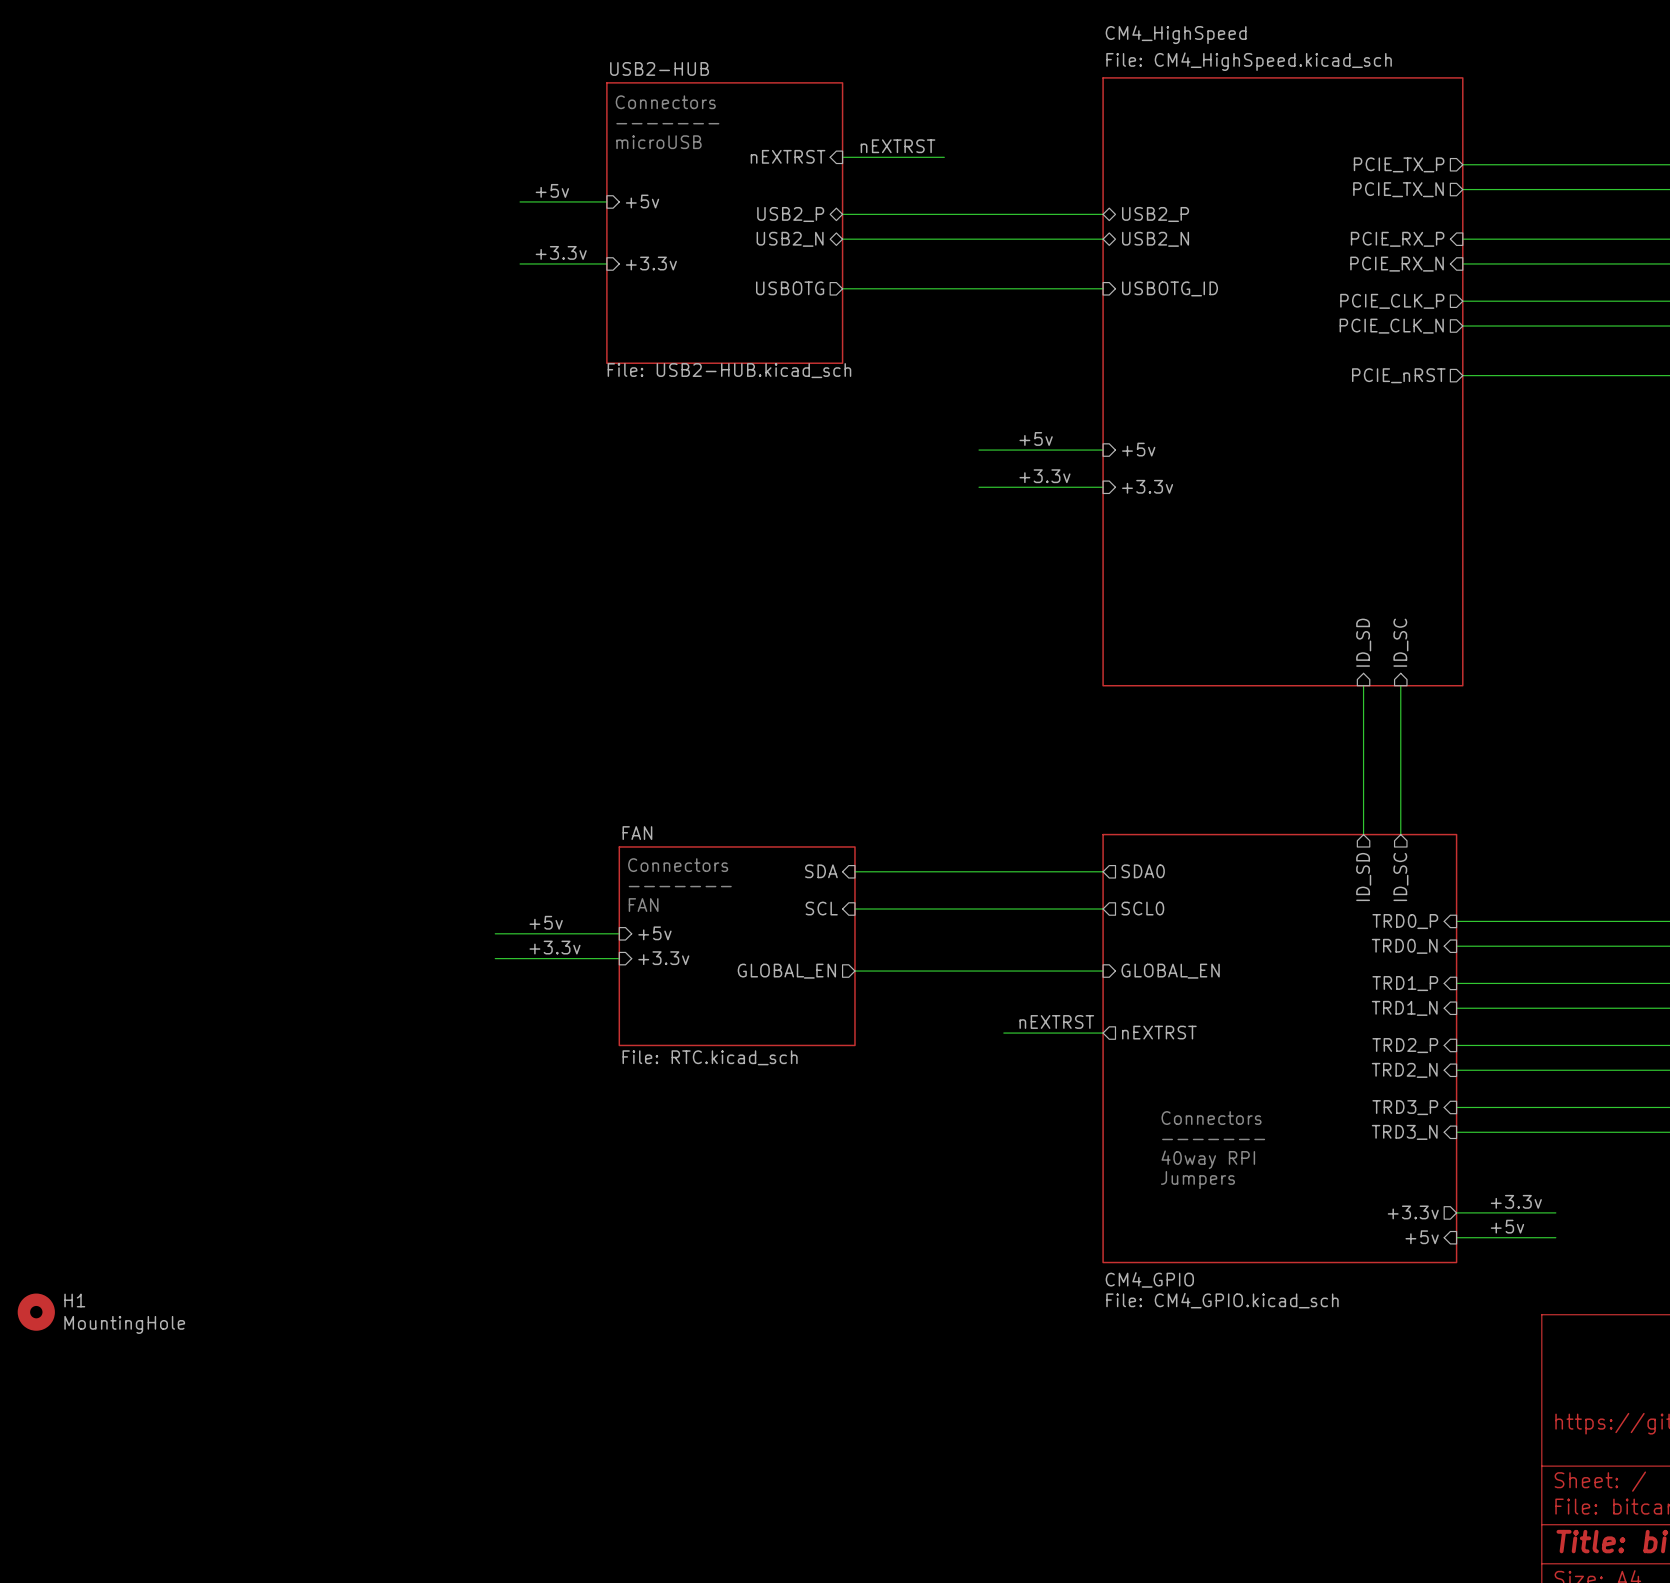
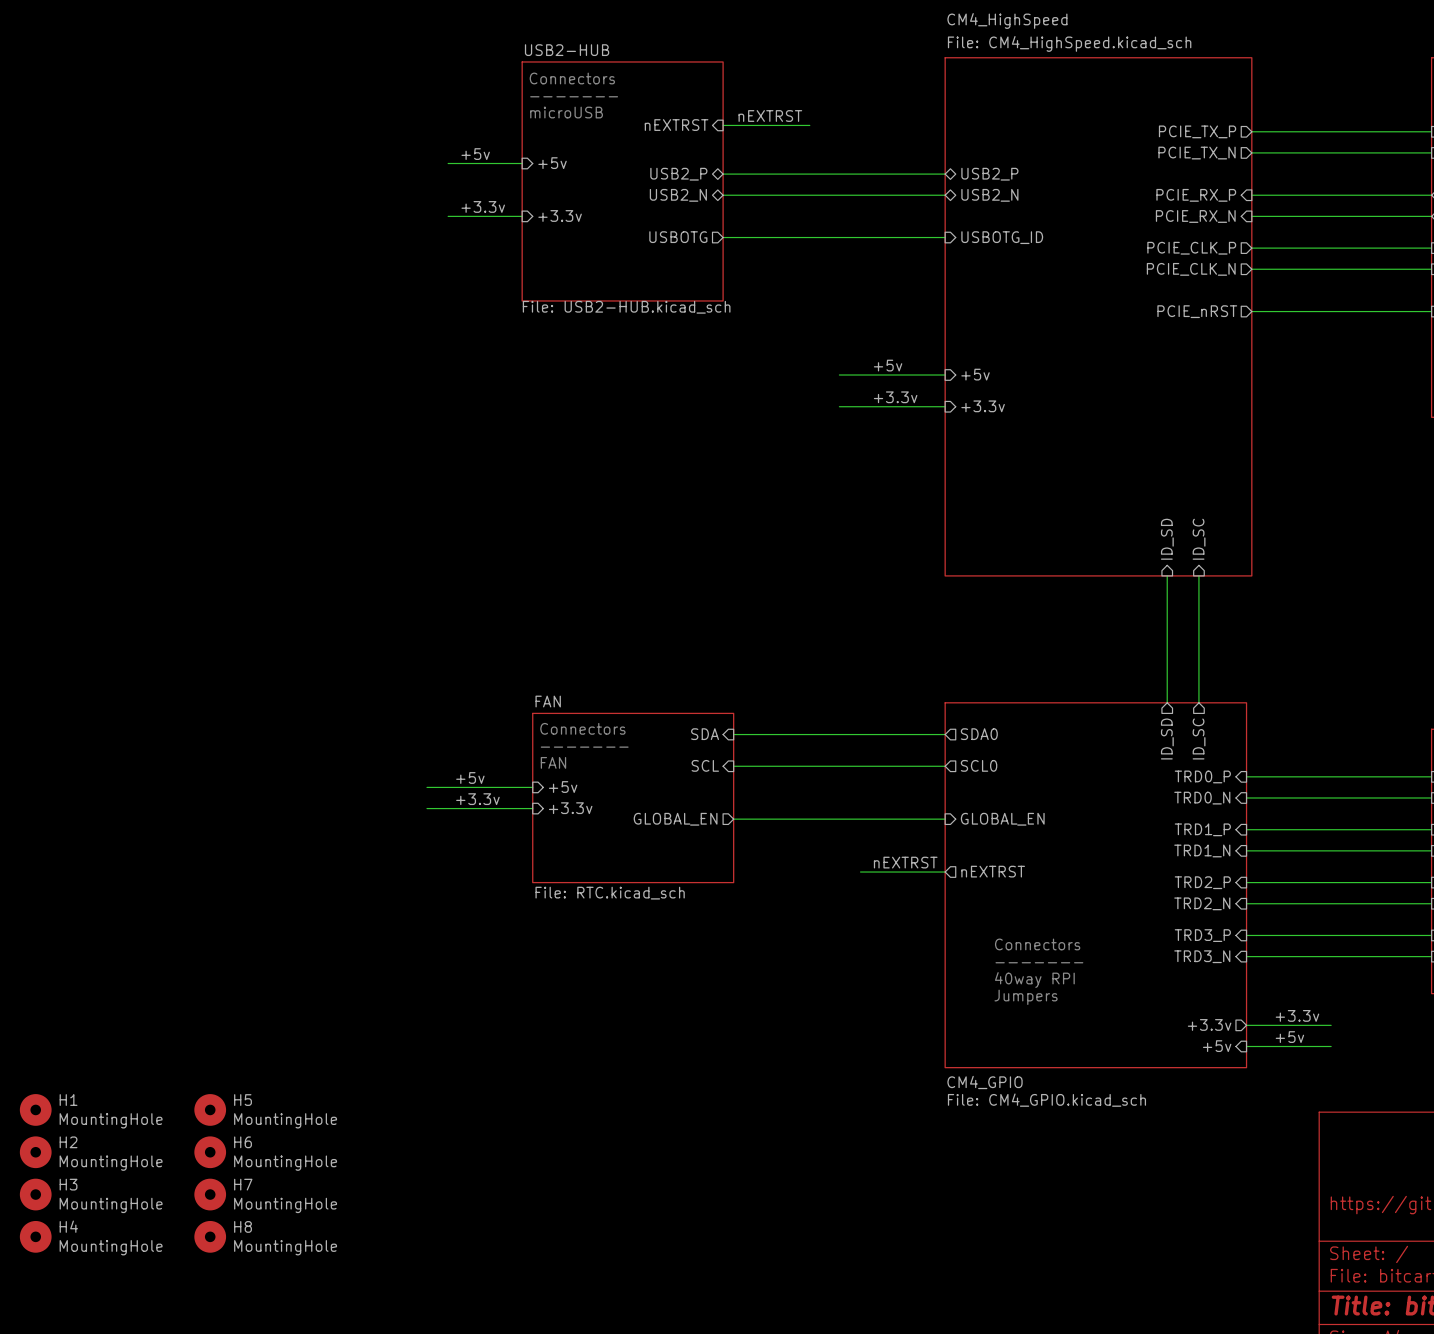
H5: none -> MountingHole (210, 1109)
H2: none -> MountingHole (35, 1152)
H6: none -> MountingHole (210, 1152)
H3: none -> MountingHole (35, 1194)
H7: none -> MountingHole (210, 1194)
H4: none -> MountingHole (35, 1236)
H8: none -> MountingHole (210, 1236)

